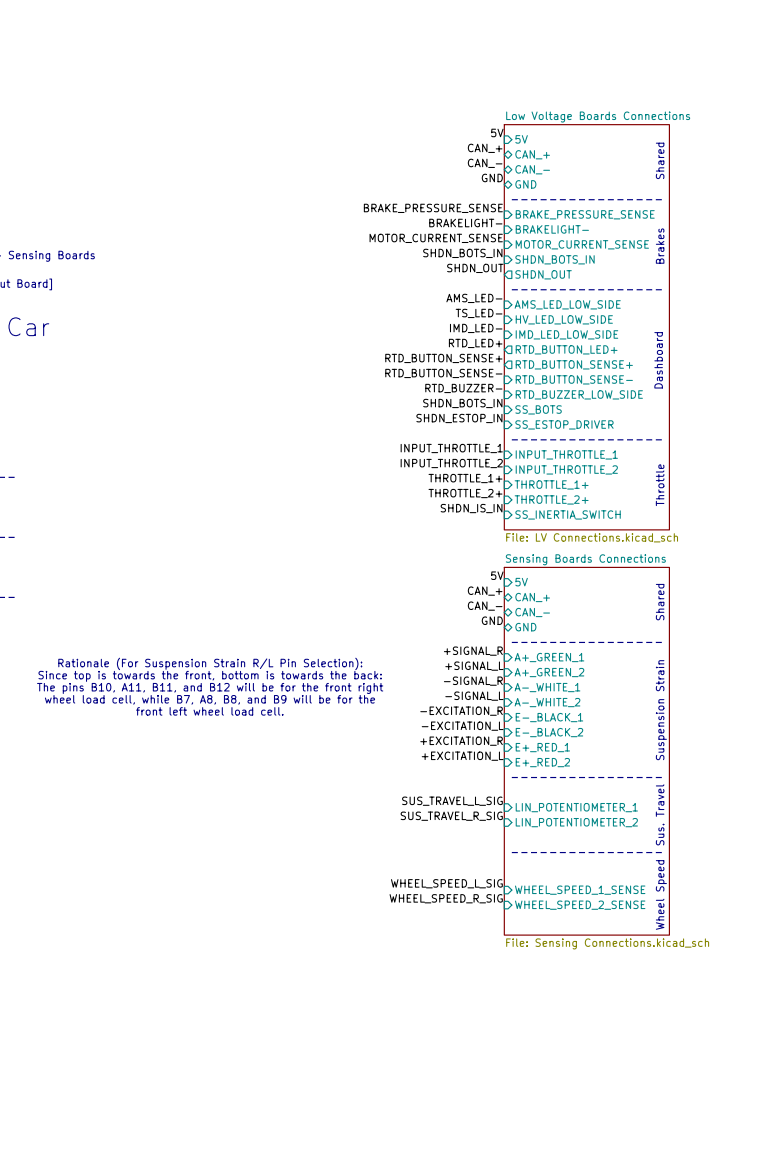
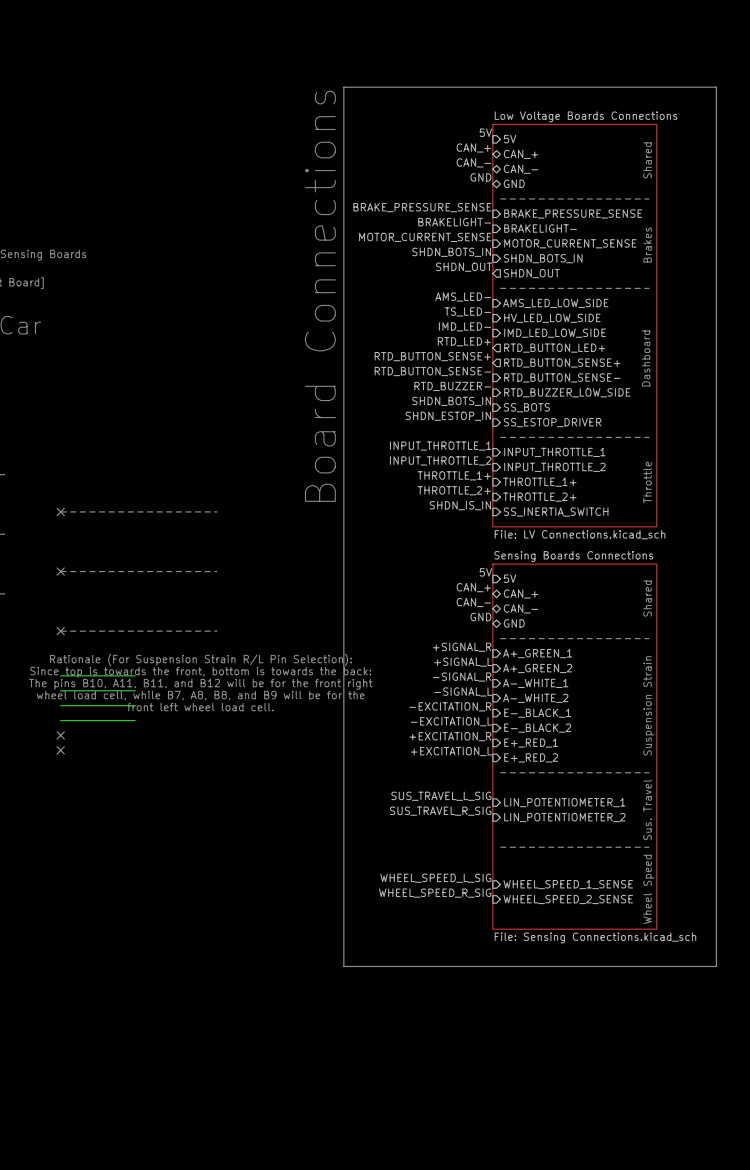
line: none -> (343, 87) (716, 87) (716, 966) (343, 966) (343, 87)
text: none -> Board Connections (320, 296)
line: none -> (60, 511) (217, 511)
no-connect mark: none -> (60, 511)
line: none -> (60, 571) (217, 571)
no-connect mark: none -> (60, 571)
line: none -> (60, 631) (217, 631)
no-connect mark: none -> (60, 631)
wire: none -> (60, 675) (135, 675)
wire: none -> (60, 690) (135, 690)
wire: none -> (60, 705) (135, 705)
wire: none -> (60, 720) (135, 720)
no-connect mark: none -> (60, 735)
no-connect mark: none -> (60, 750)

